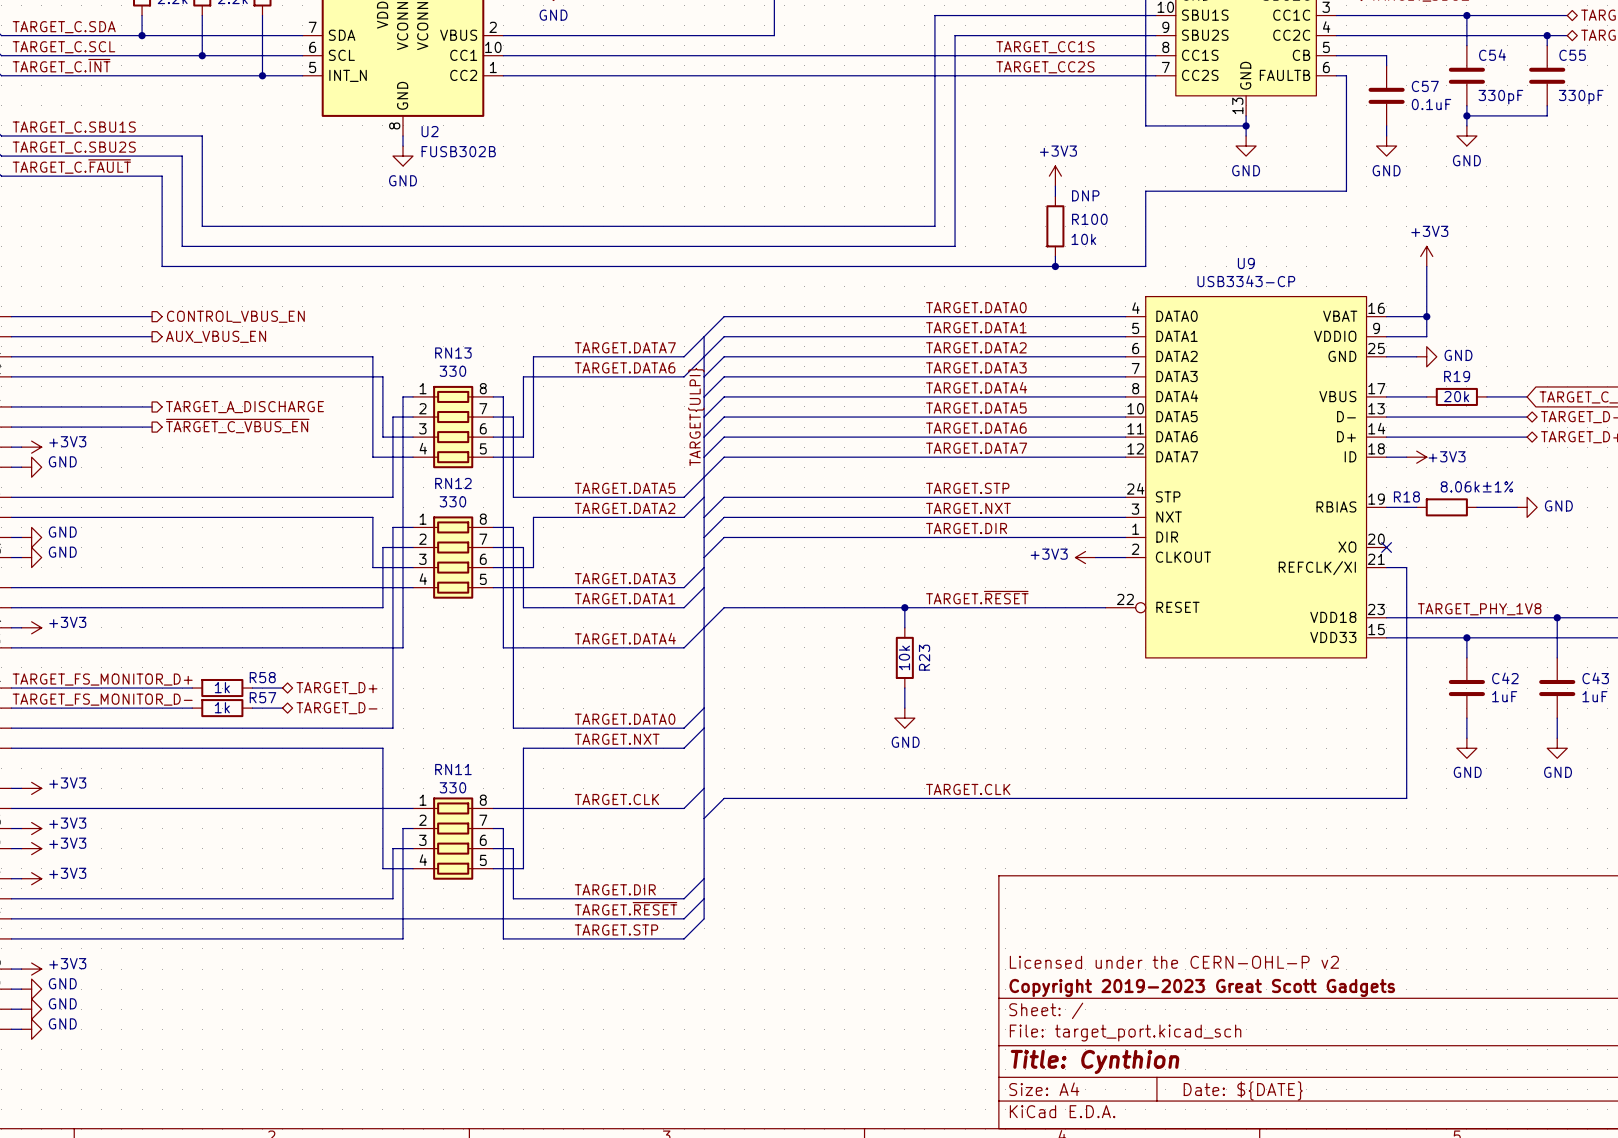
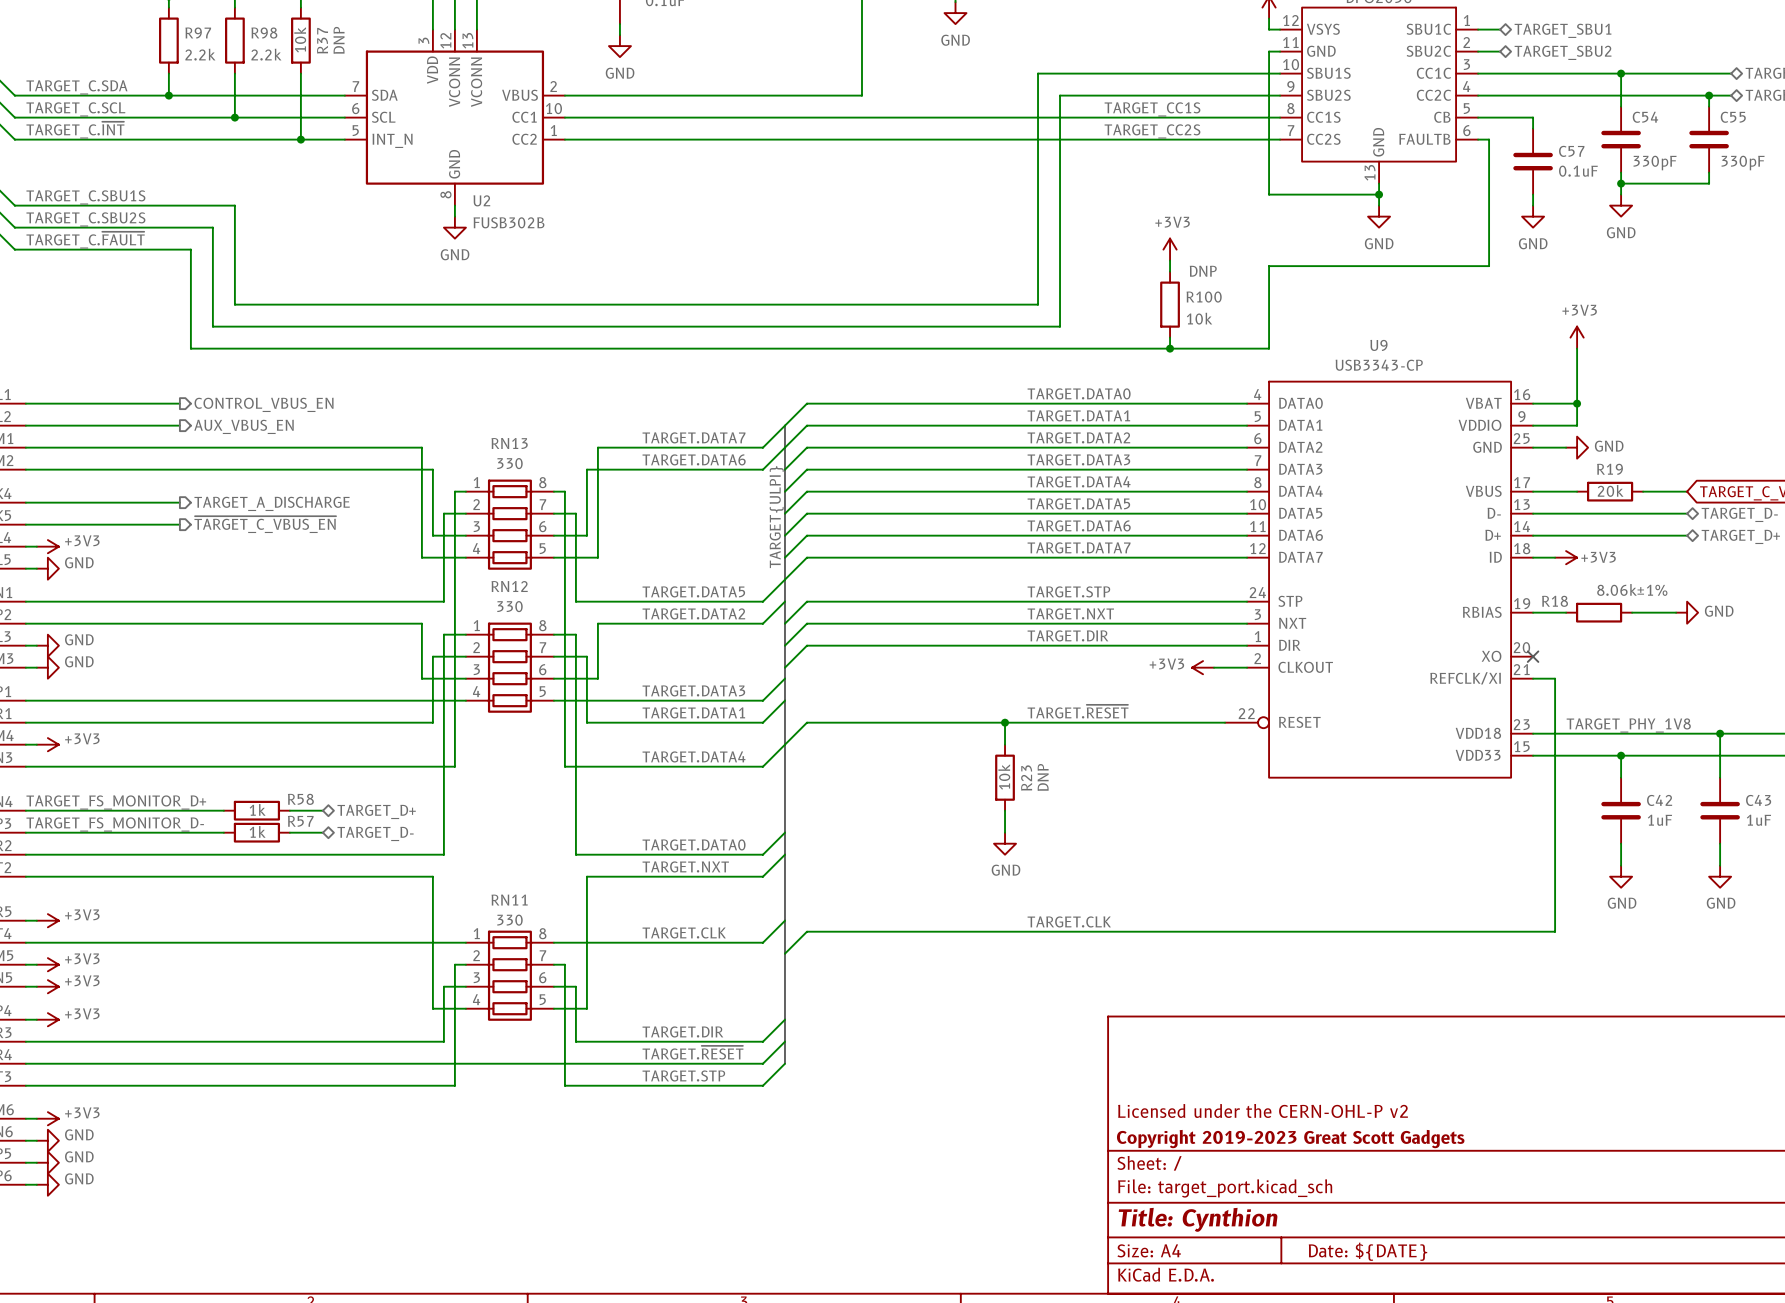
R23 text: none -> DNP (1043, 777)

